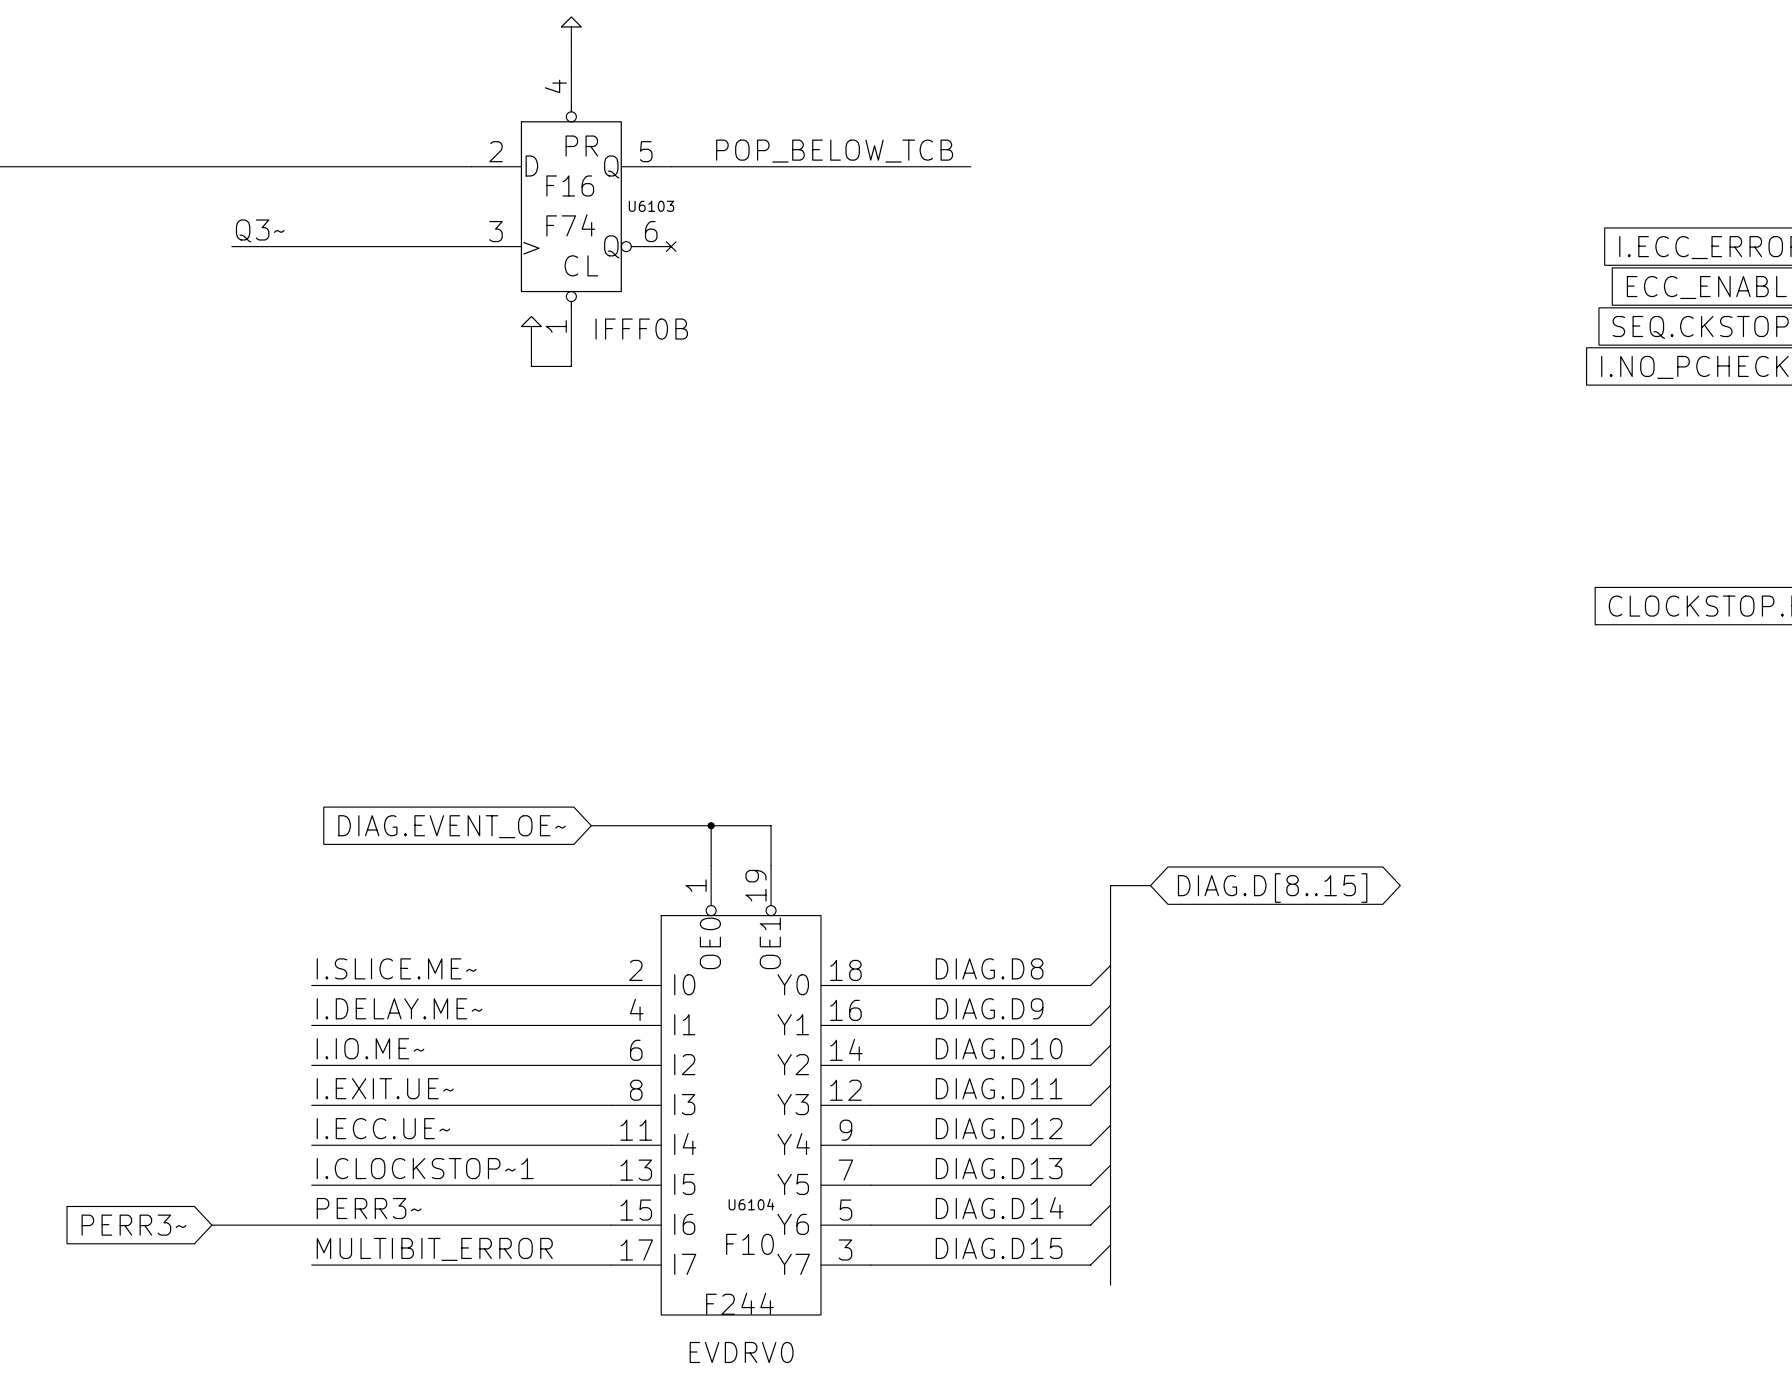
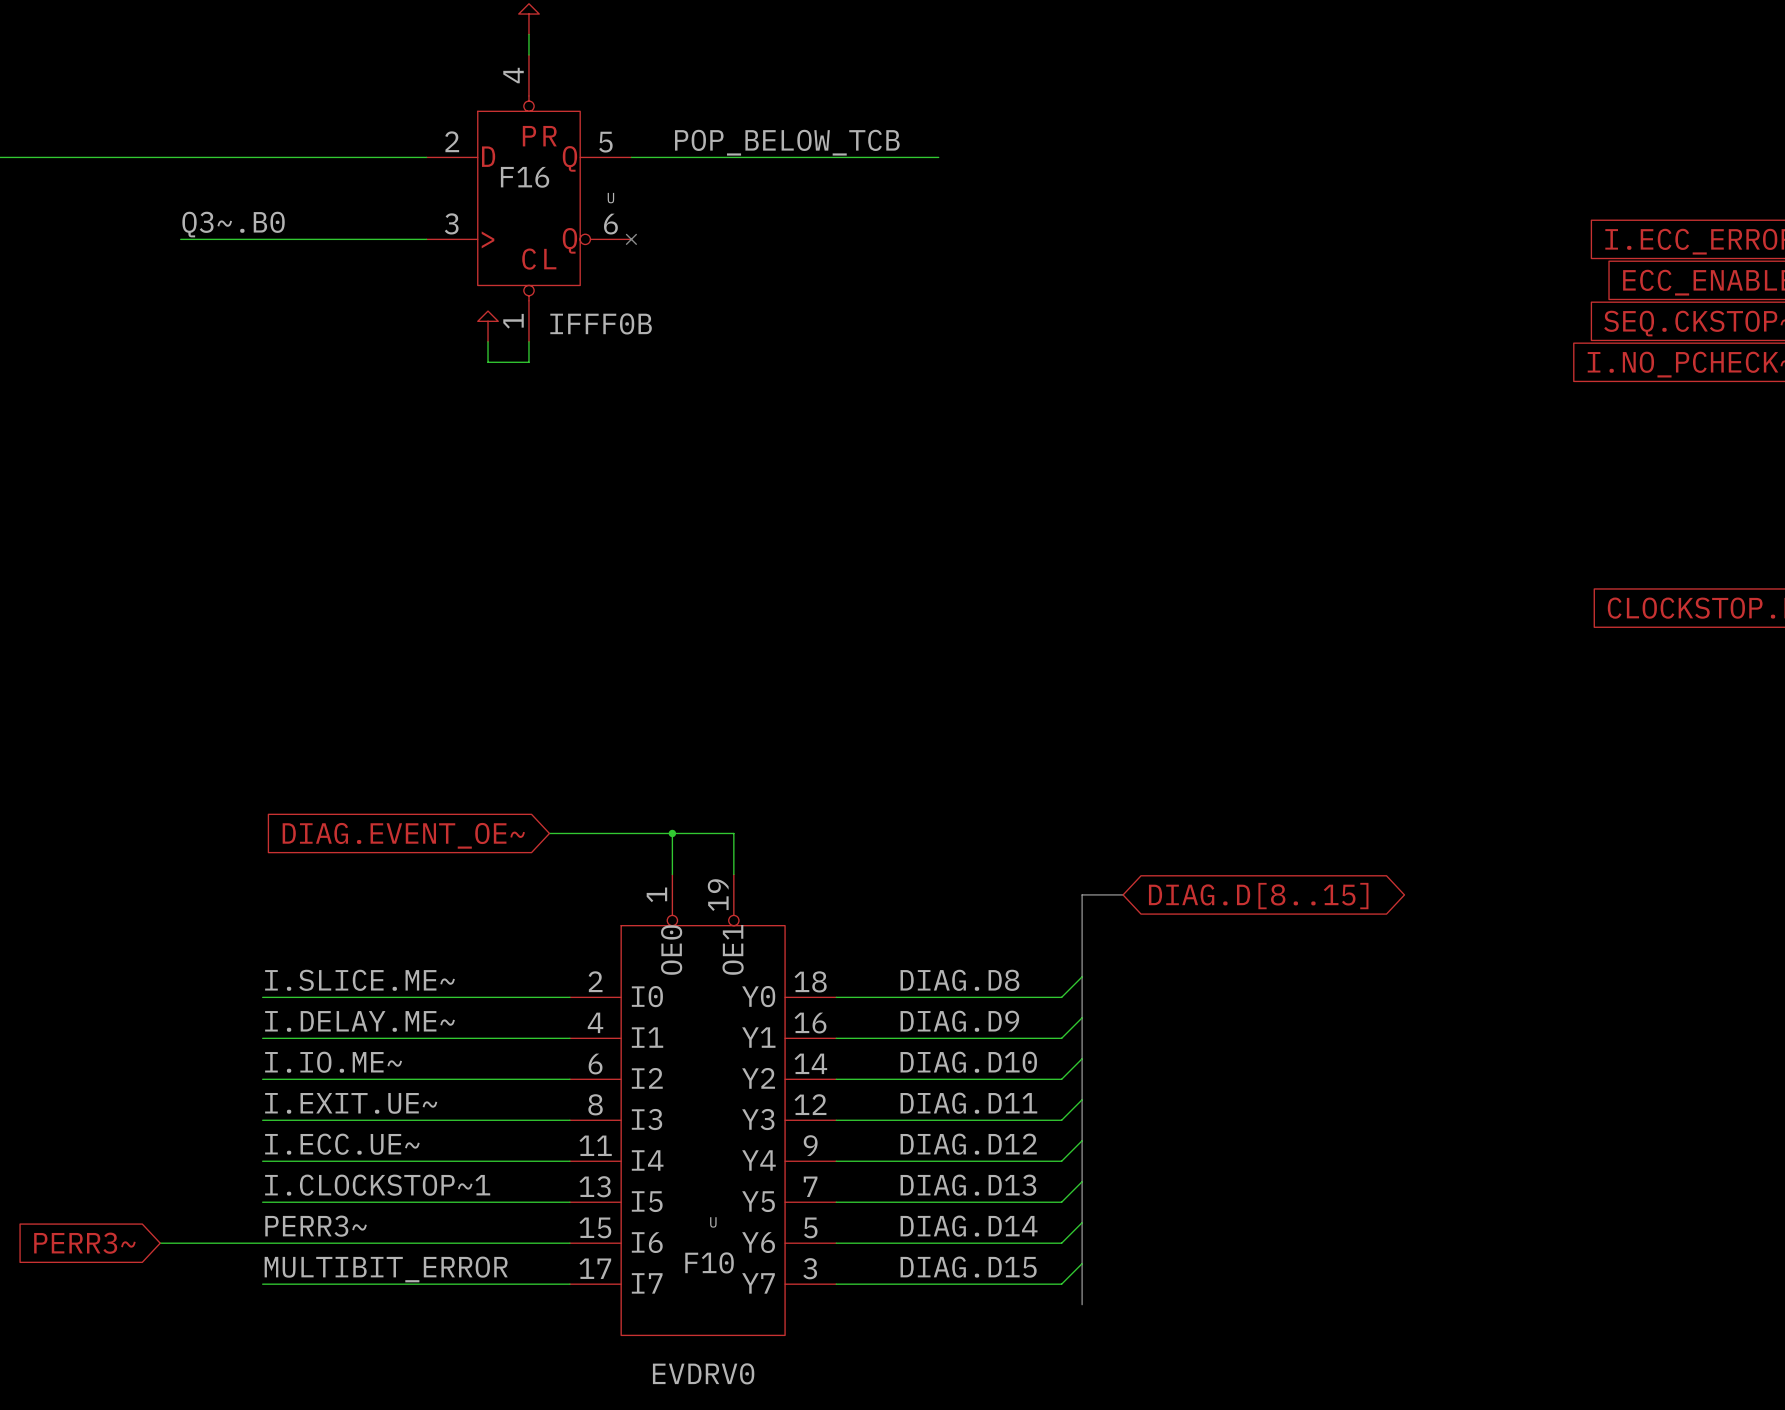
U6103 name: U6103 (651, 206) -> U (610, 198)
U6103 value: F74 (570, 225) -> none
label: Q3~ (260, 230) -> Q3~.B0 (233, 224)
U6104 name: U6104 (751, 1204) -> U (713, 1222)
U6104 value: F244 (739, 1303) -> none

